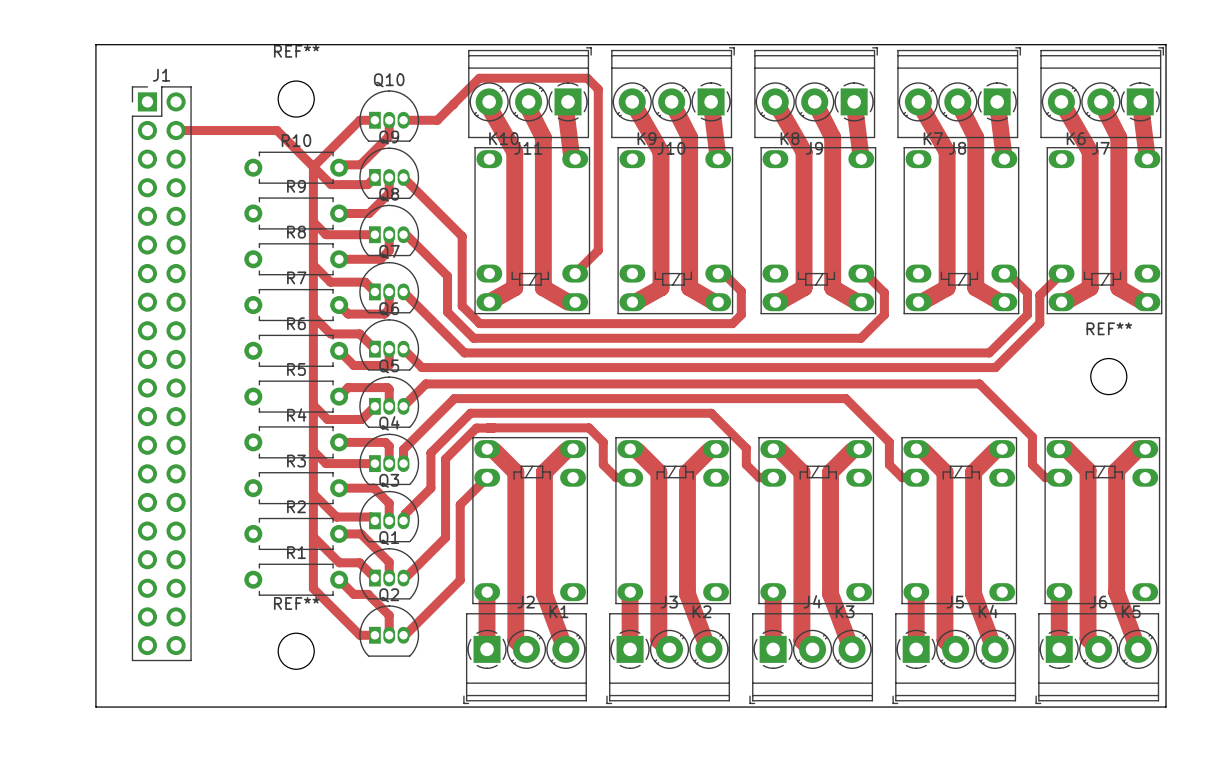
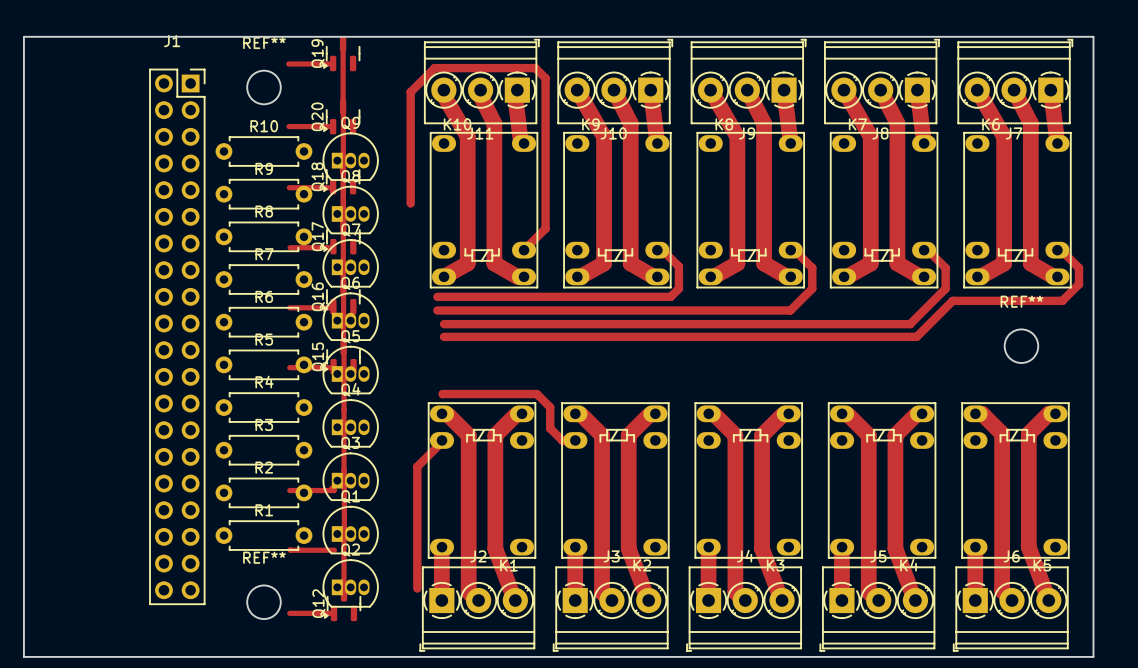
board edge: (95, 44) (95, 707) (1166, 707) (1166, 44) -> (77, 36) (23, 36) (23, 656) (1093, 656) (1093, 36) (1074, 36)
top track: none -> (343, 43) (344, 593)
Q19: none -> (341, 53)
top track: none -> (333, 63) (288, 64)
J1 footprint: [131, 86, 192, 662] -> [149, 68, 206, 605]
top track: (453, 104) (437, 120) (403, 120) -> none
top track: none -> (410, 92) (410, 203)
Q10: (389, 116) -> none
top track: (374, 120) (359, 120) (313, 166) (313, 588) (359, 635) (374, 635) -> none
top track: (389, 120) (389, 136) (360, 164) (342, 164) (339, 167) -> none
top track: (176, 130) (277, 130) (331, 184) (367, 184) (374, 177) -> none
Q20: none -> (341, 116)
top track: none -> (289, 126) (333, 126)
top track: (389, 177) (389, 193) (369, 213) (339, 213) -> none
top track: (405, 177) (462, 236) (462, 306) (479, 323) (482, 323) -> none
Q18: none -> (341, 176)
top track: none -> (333, 186) (289, 187)
top track: (313, 222) (326, 234) (374, 234) -> none
top track: (389, 234) (389, 250) (380, 259) (339, 259) -> none
top track: (405, 234) (447, 276) (447, 312) (473, 338) (482, 338) -> none
Q17: none -> (341, 236)
top track: (313, 264) (330, 282) (365, 282) (374, 291) -> none
top track: none -> (333, 246) (290, 247)
top track: (1061, 273) (1039, 295) (1039, 323) (1035, 327) -> (1061, 250) (1078, 268) (1078, 284) (1062, 300) (952, 300)
top track: (389, 291) (389, 309) (384, 314) (348, 314) (339, 305) -> none
top track: (405, 291) (464, 352) (489, 352) -> none
top track: (313, 316) (330, 333) (359, 333) (374, 349) -> none
Q16: none -> (341, 296)
top track: none -> (333, 306) (289, 307)
top track: (389, 349) (388, 365) (353, 365) (339, 350) -> none
top track: (403, 349) (421, 367) (996, 366) -> (444, 336) (916, 336)
Q15: none -> (342, 356)
top track: (339, 396) (348, 387) (387, 387) (389, 389) (389, 406) -> none
top track: none -> (333, 366) (289, 367)
top track: (313, 405) (327, 419) (361, 419) (374, 406) -> none
top track: (403, 406) (425, 383) (979, 383) (1032, 436) (1032, 464) (1045, 477) (1059, 477) -> none
top track: (493, 427) (476, 428) (445, 458) (445, 537) (405, 578) -> none
top track: (339, 442) (385, 442) (389, 446) (389, 463) -> none
top track: (313, 450) (326, 463) (374, 463) -> none
top track: (403, 463) (403, 449) (454, 398) (845, 398) (889, 442) (889, 464) (902, 477) (916, 477) -> none
top track: (487, 477) (460, 504) (460, 580) (405, 635) -> none
top track: (773, 477) (759, 477) (746, 464) (746, 448) (711, 413) (470, 413) (430, 452) (430, 488) (405, 513) (405, 520) -> none
top track: none -> (442, 441) (417, 466) (417, 588)
top track: (339, 488) (374, 488) (389, 503) (389, 520) -> none
top track: (313, 493) (336, 517) (371, 517) (374, 520) -> none
top track: none -> (331, 488) (333, 490) (289, 490)
top track: (339, 533) (360, 533) (389, 562) (389, 578) -> none
top track: (313, 536) (339, 562) (359, 562) (374, 578) -> none
top track: (339, 579) (353, 594) (368, 594) (389, 615) (389, 635) -> none
top track: none -> (290, 549) (334, 550)
Q12: none -> (342, 603)
top track: none -> (289, 613) (333, 613)

